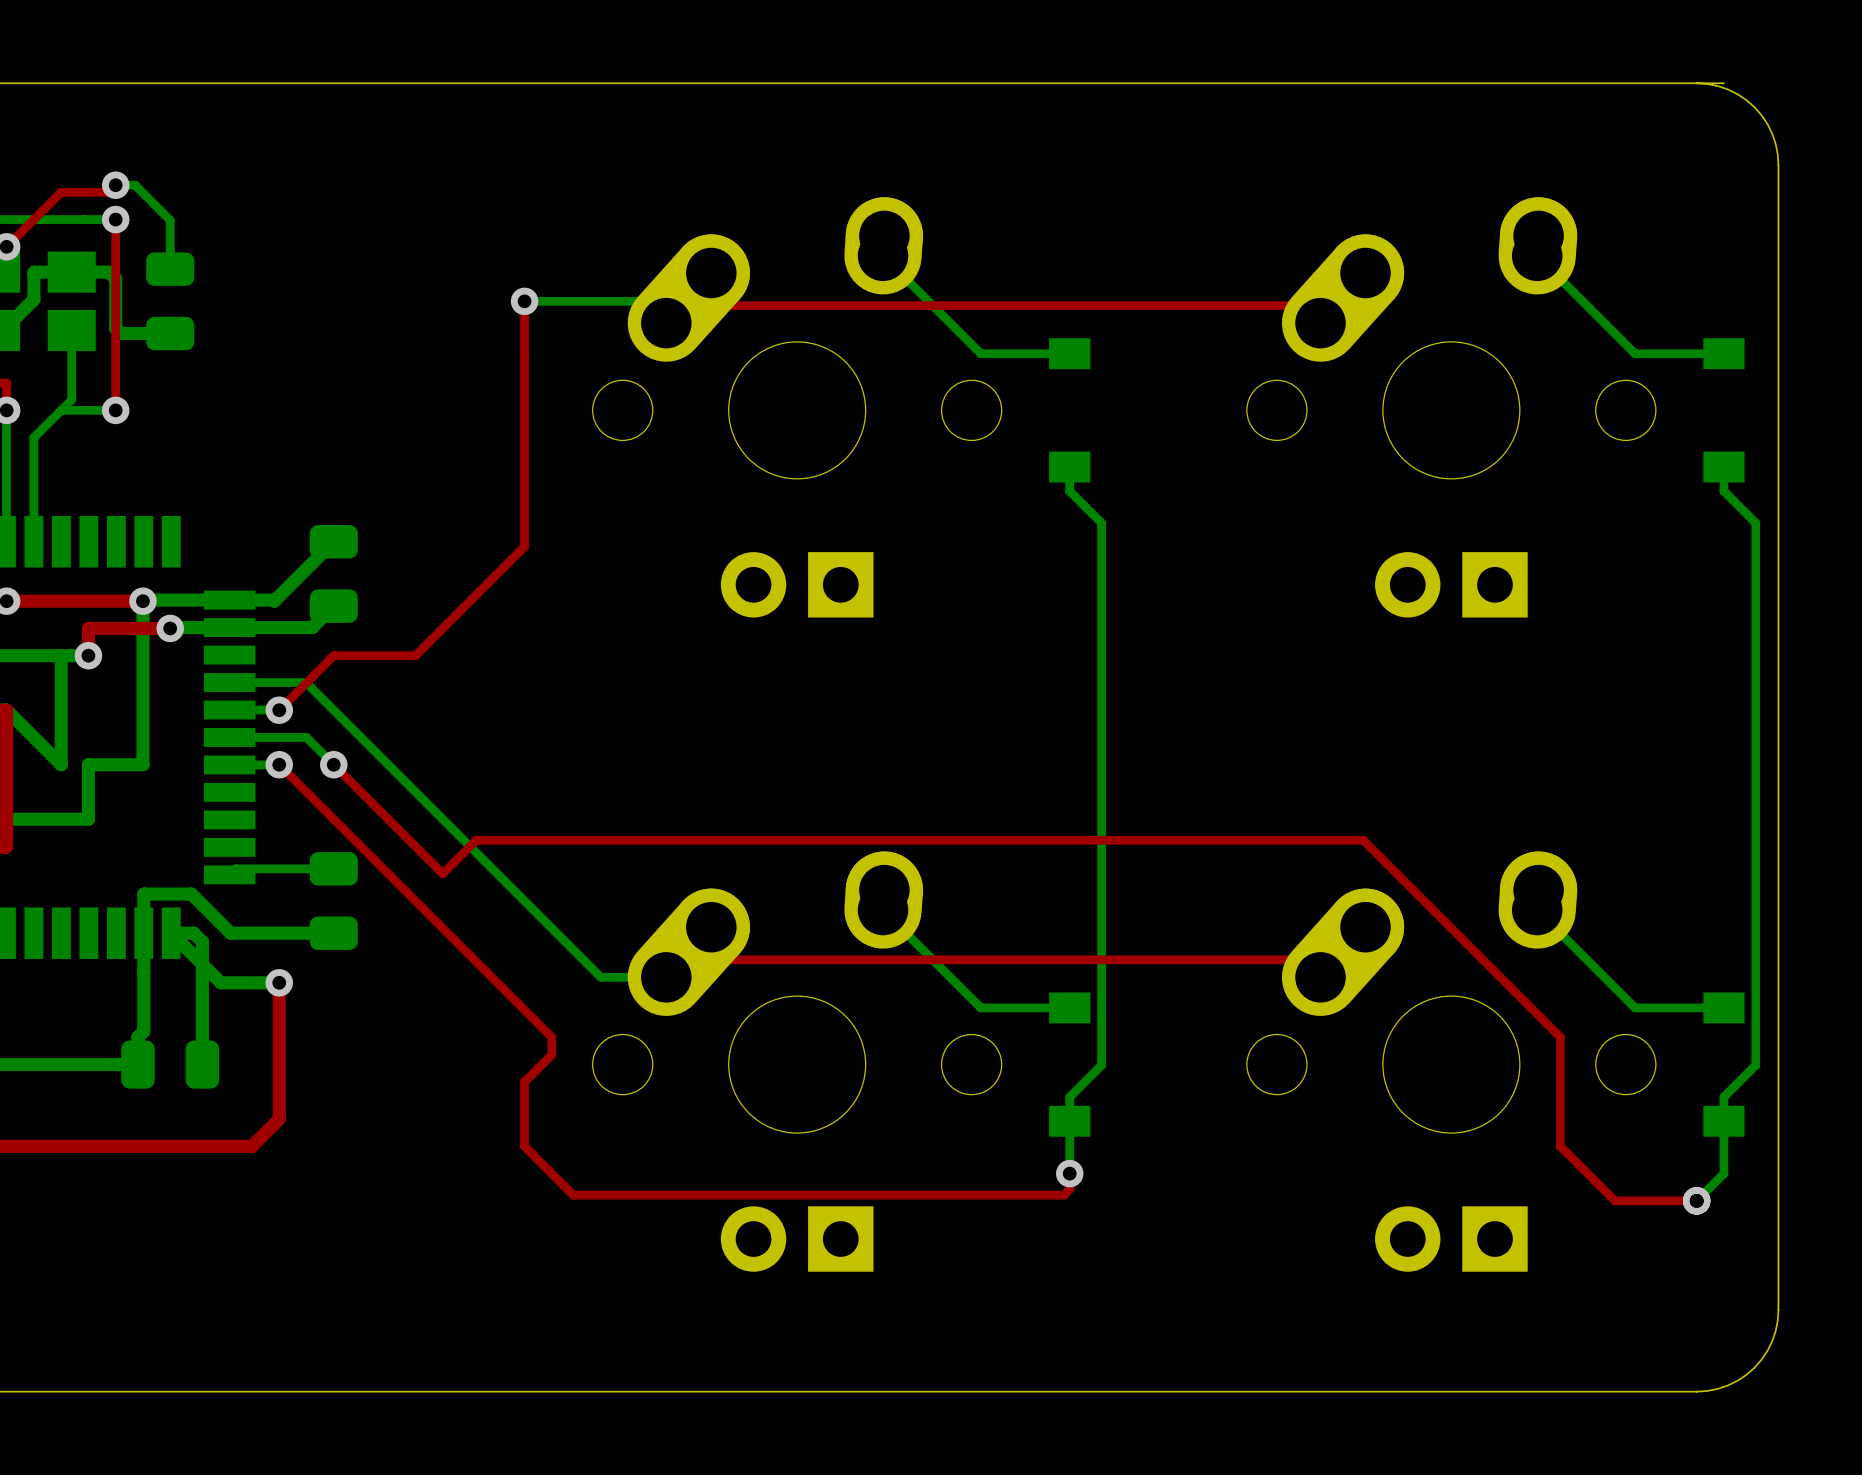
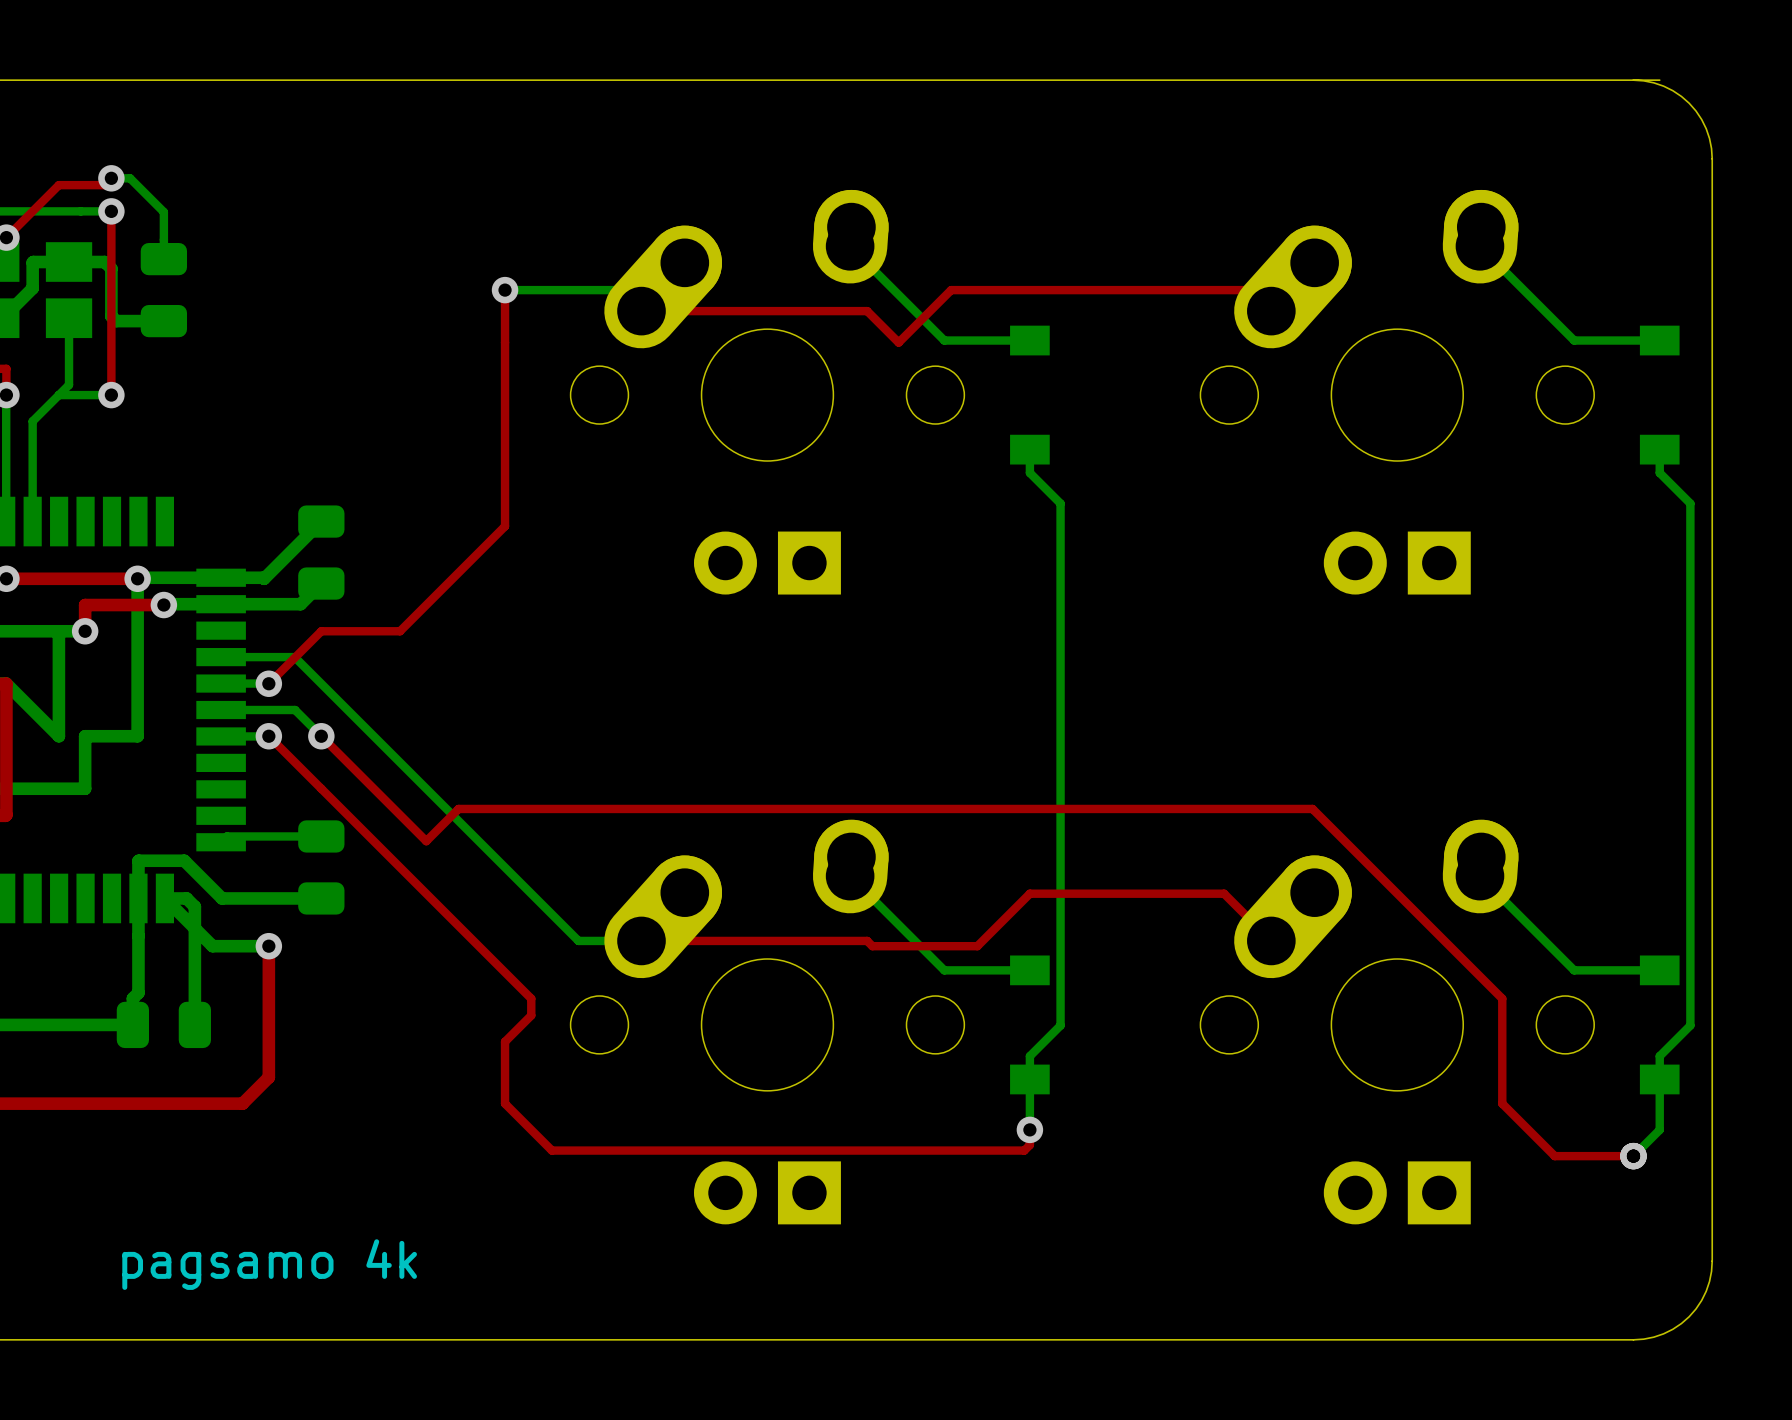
top track: (683, 305) (1302, 305) -> (641, 311) (867, 311) (898, 342) (951, 290) (1250, 290) (1254, 294)
top track: (683, 959) (1302, 959) -> (641, 940) (867, 940) (872, 946) (977, 946) (1029, 893) (1224, 893) (1254, 924)
text: none -> pagsamo 4k (269, 1264)

